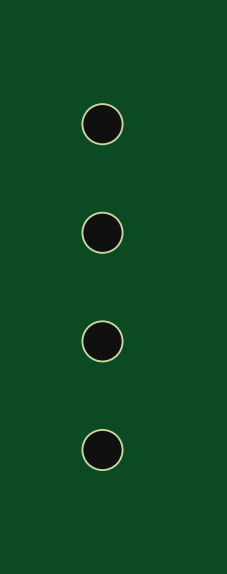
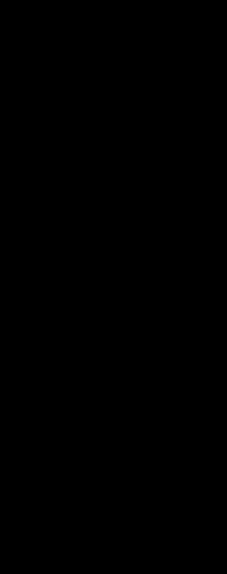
part: (102, 124) -> none
part: (102, 232) -> none
part: (102, 341) -> none
part: (102, 449) -> none

